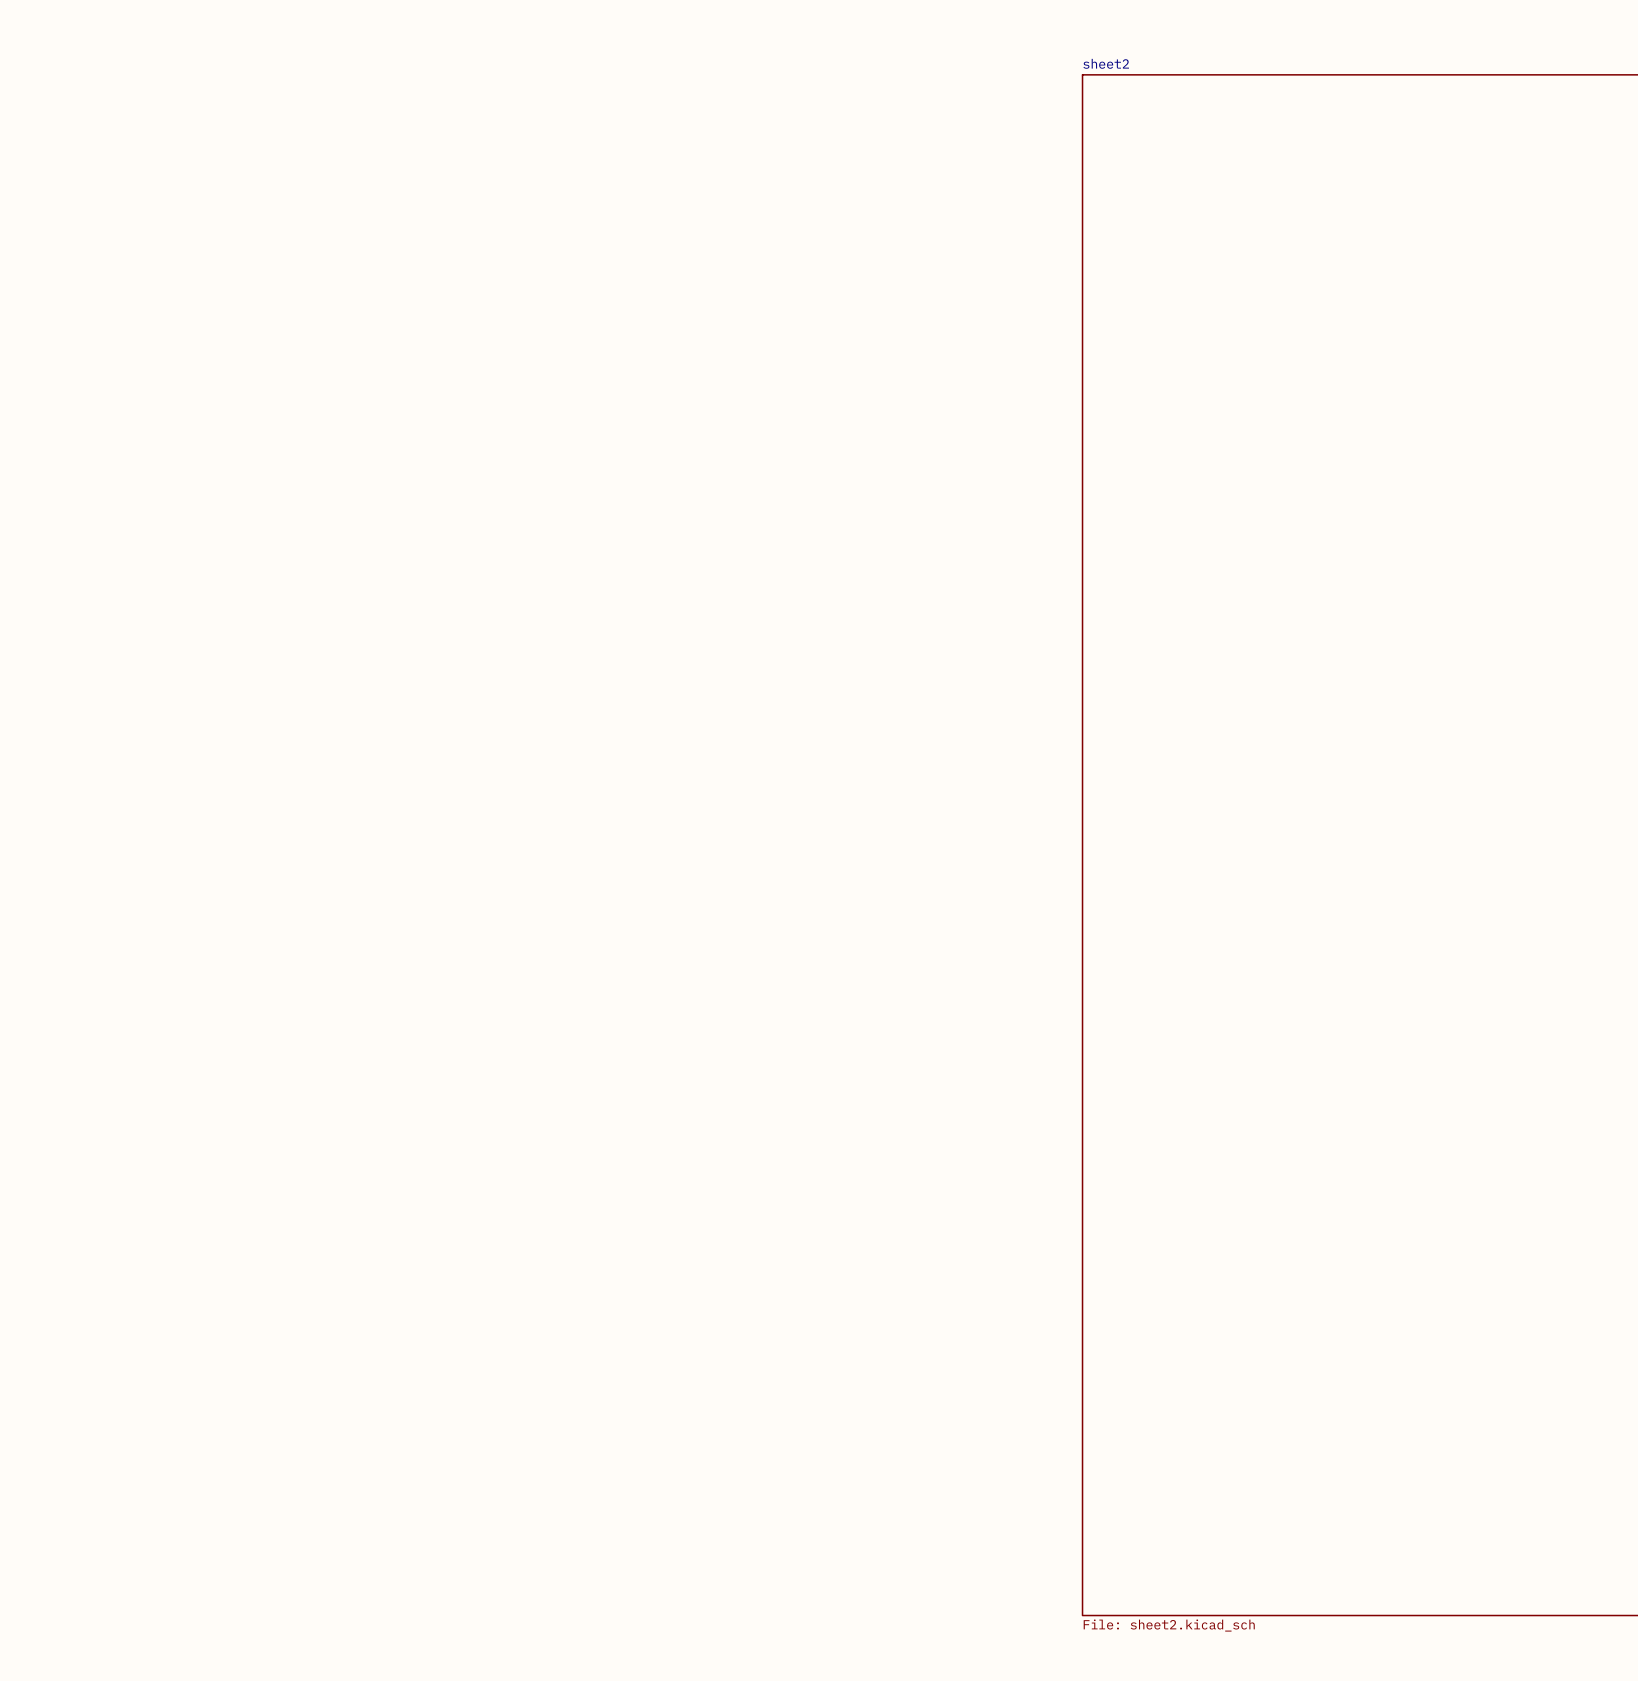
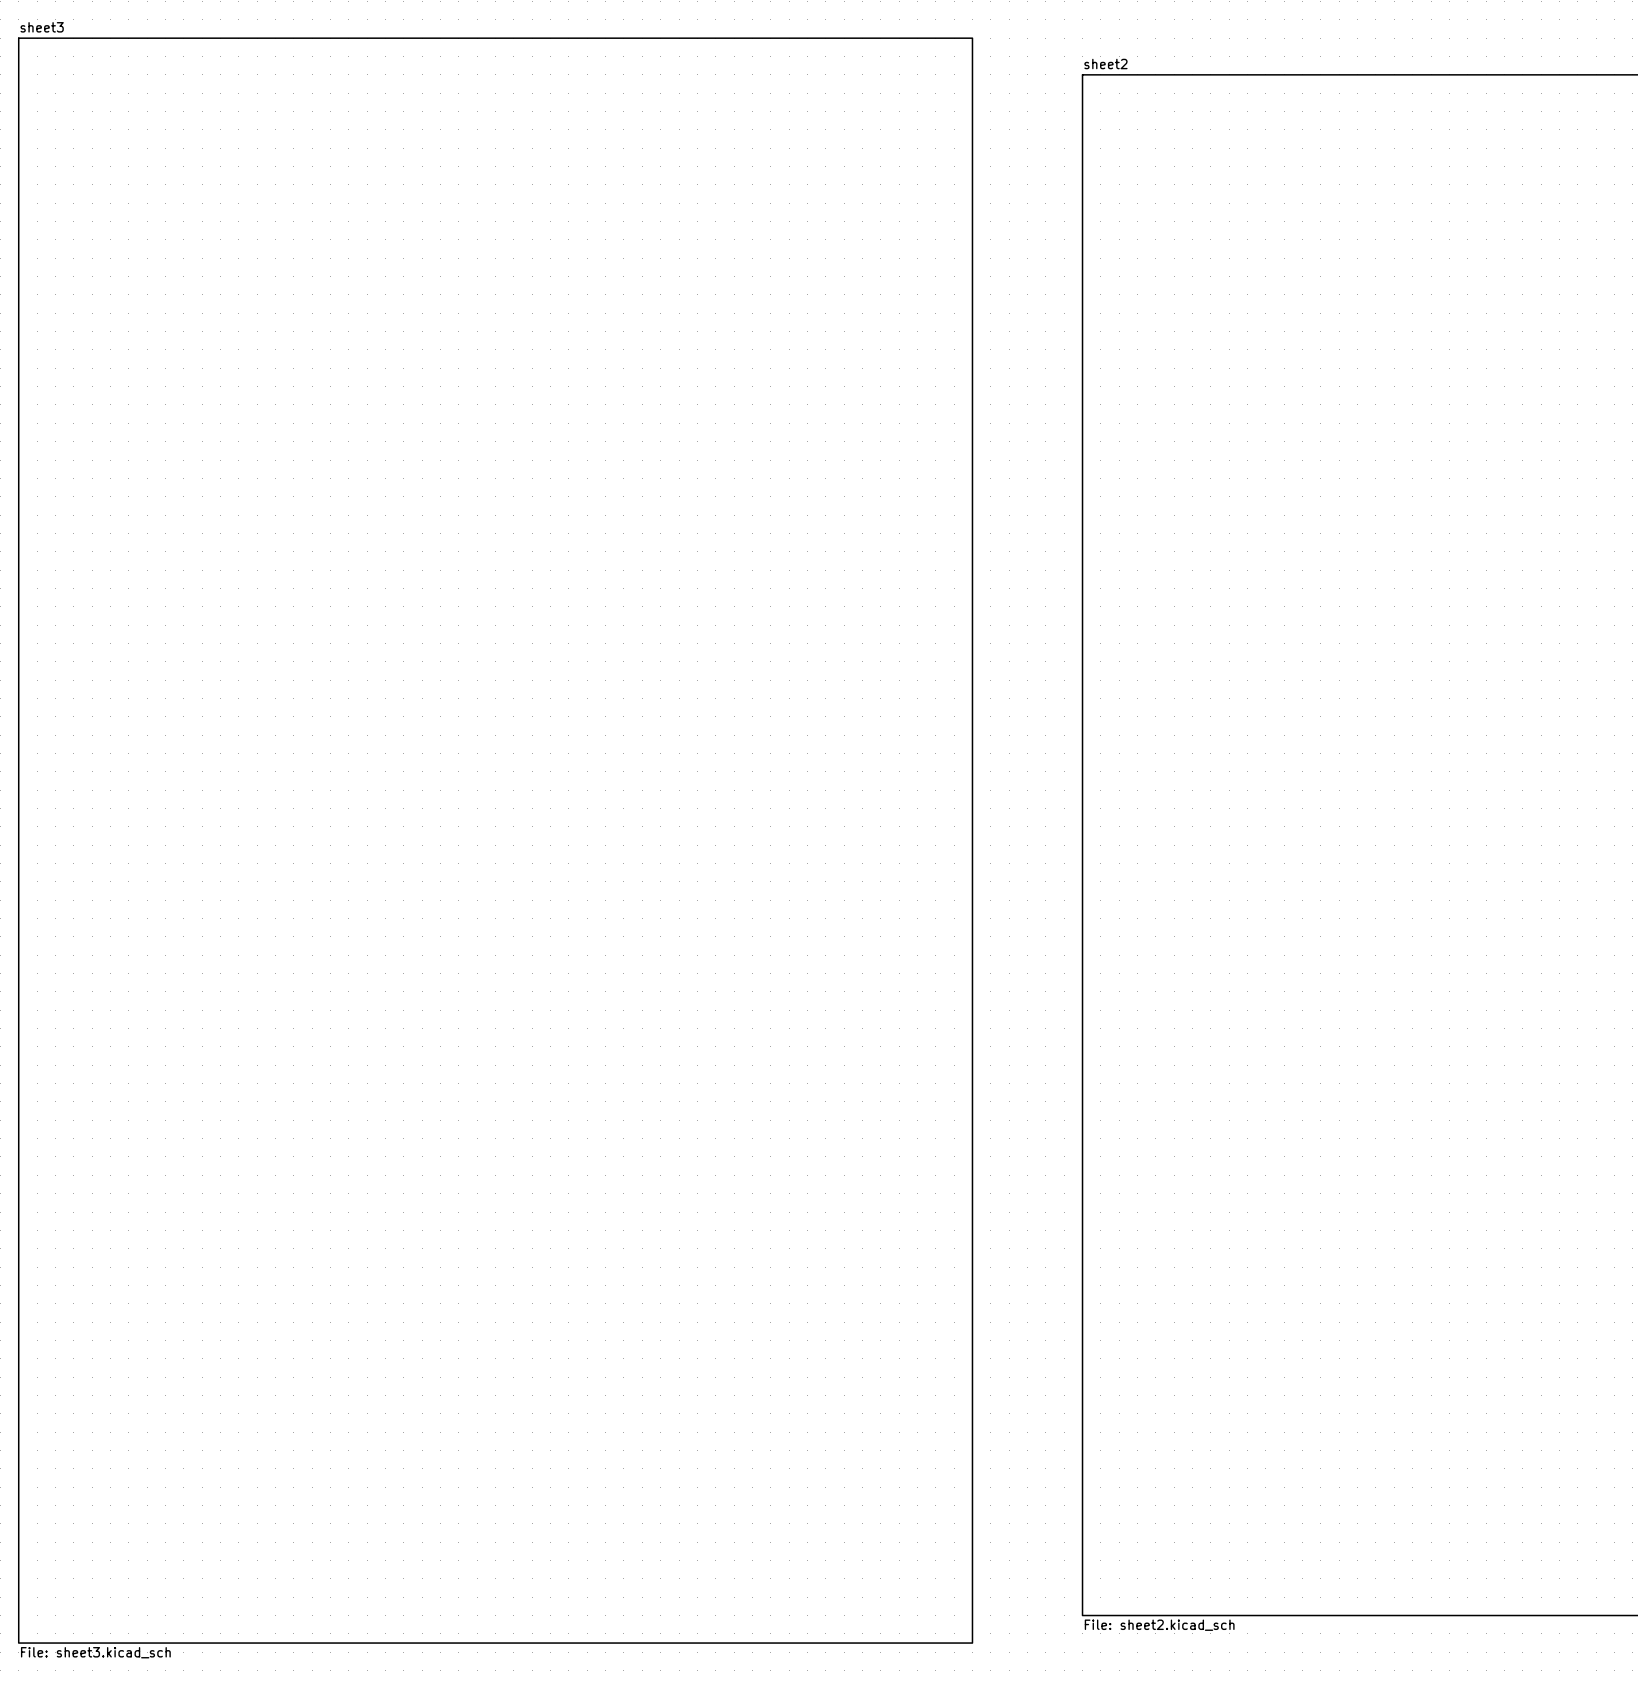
sheet sheet3: none -> File: sheet3.kicad_sch (495, 840)

